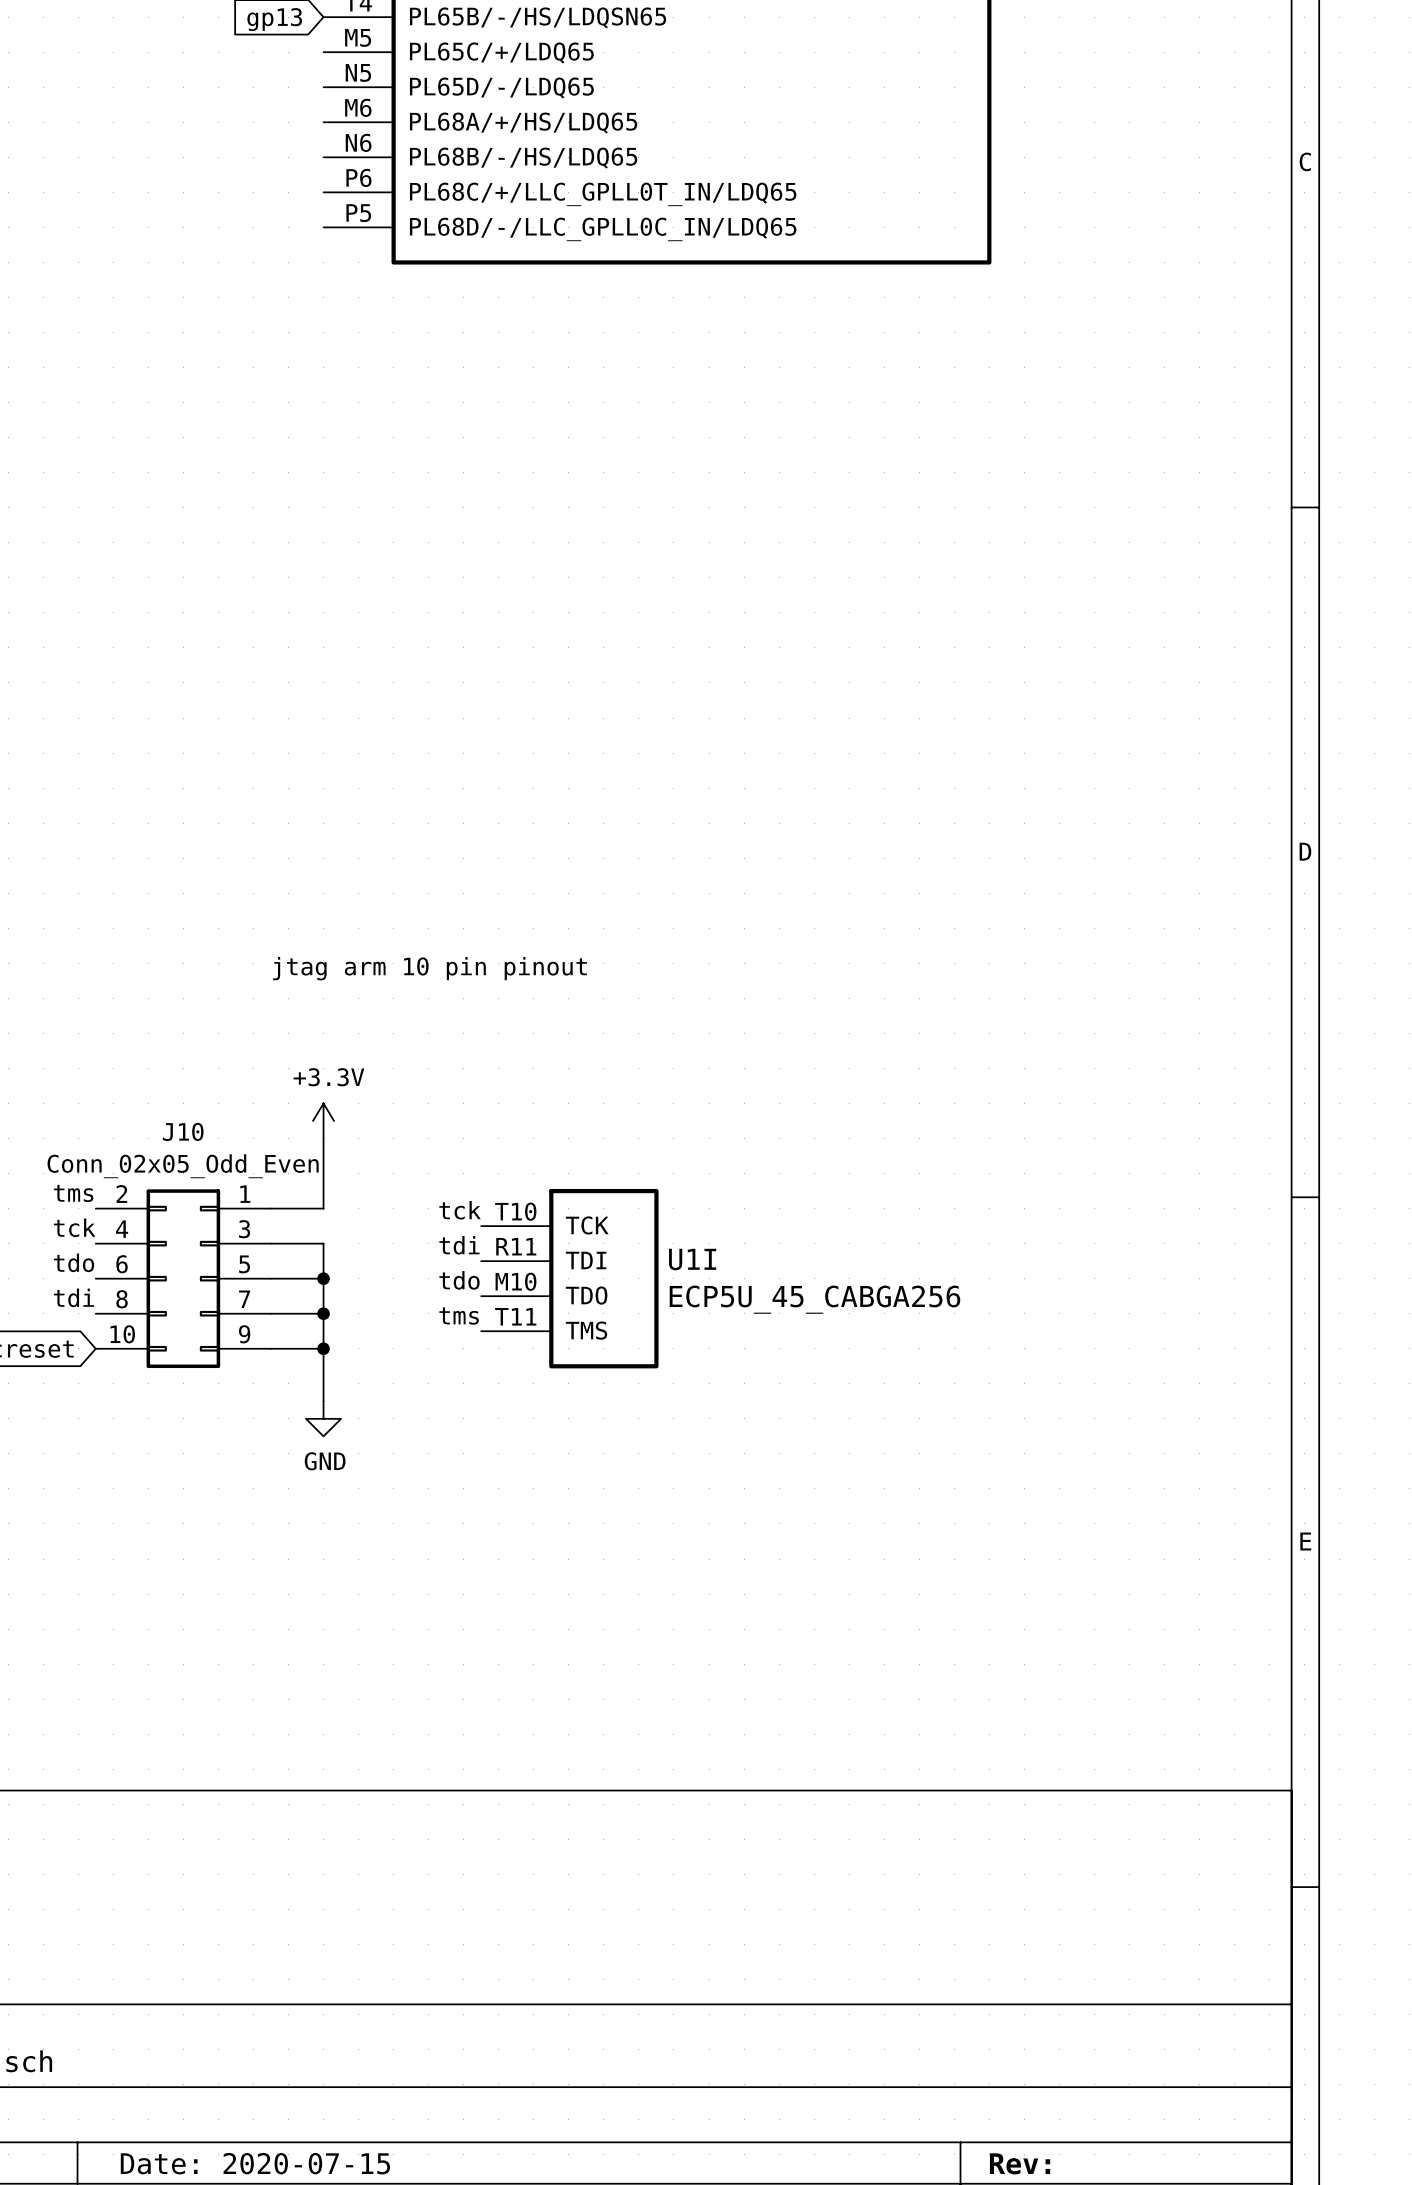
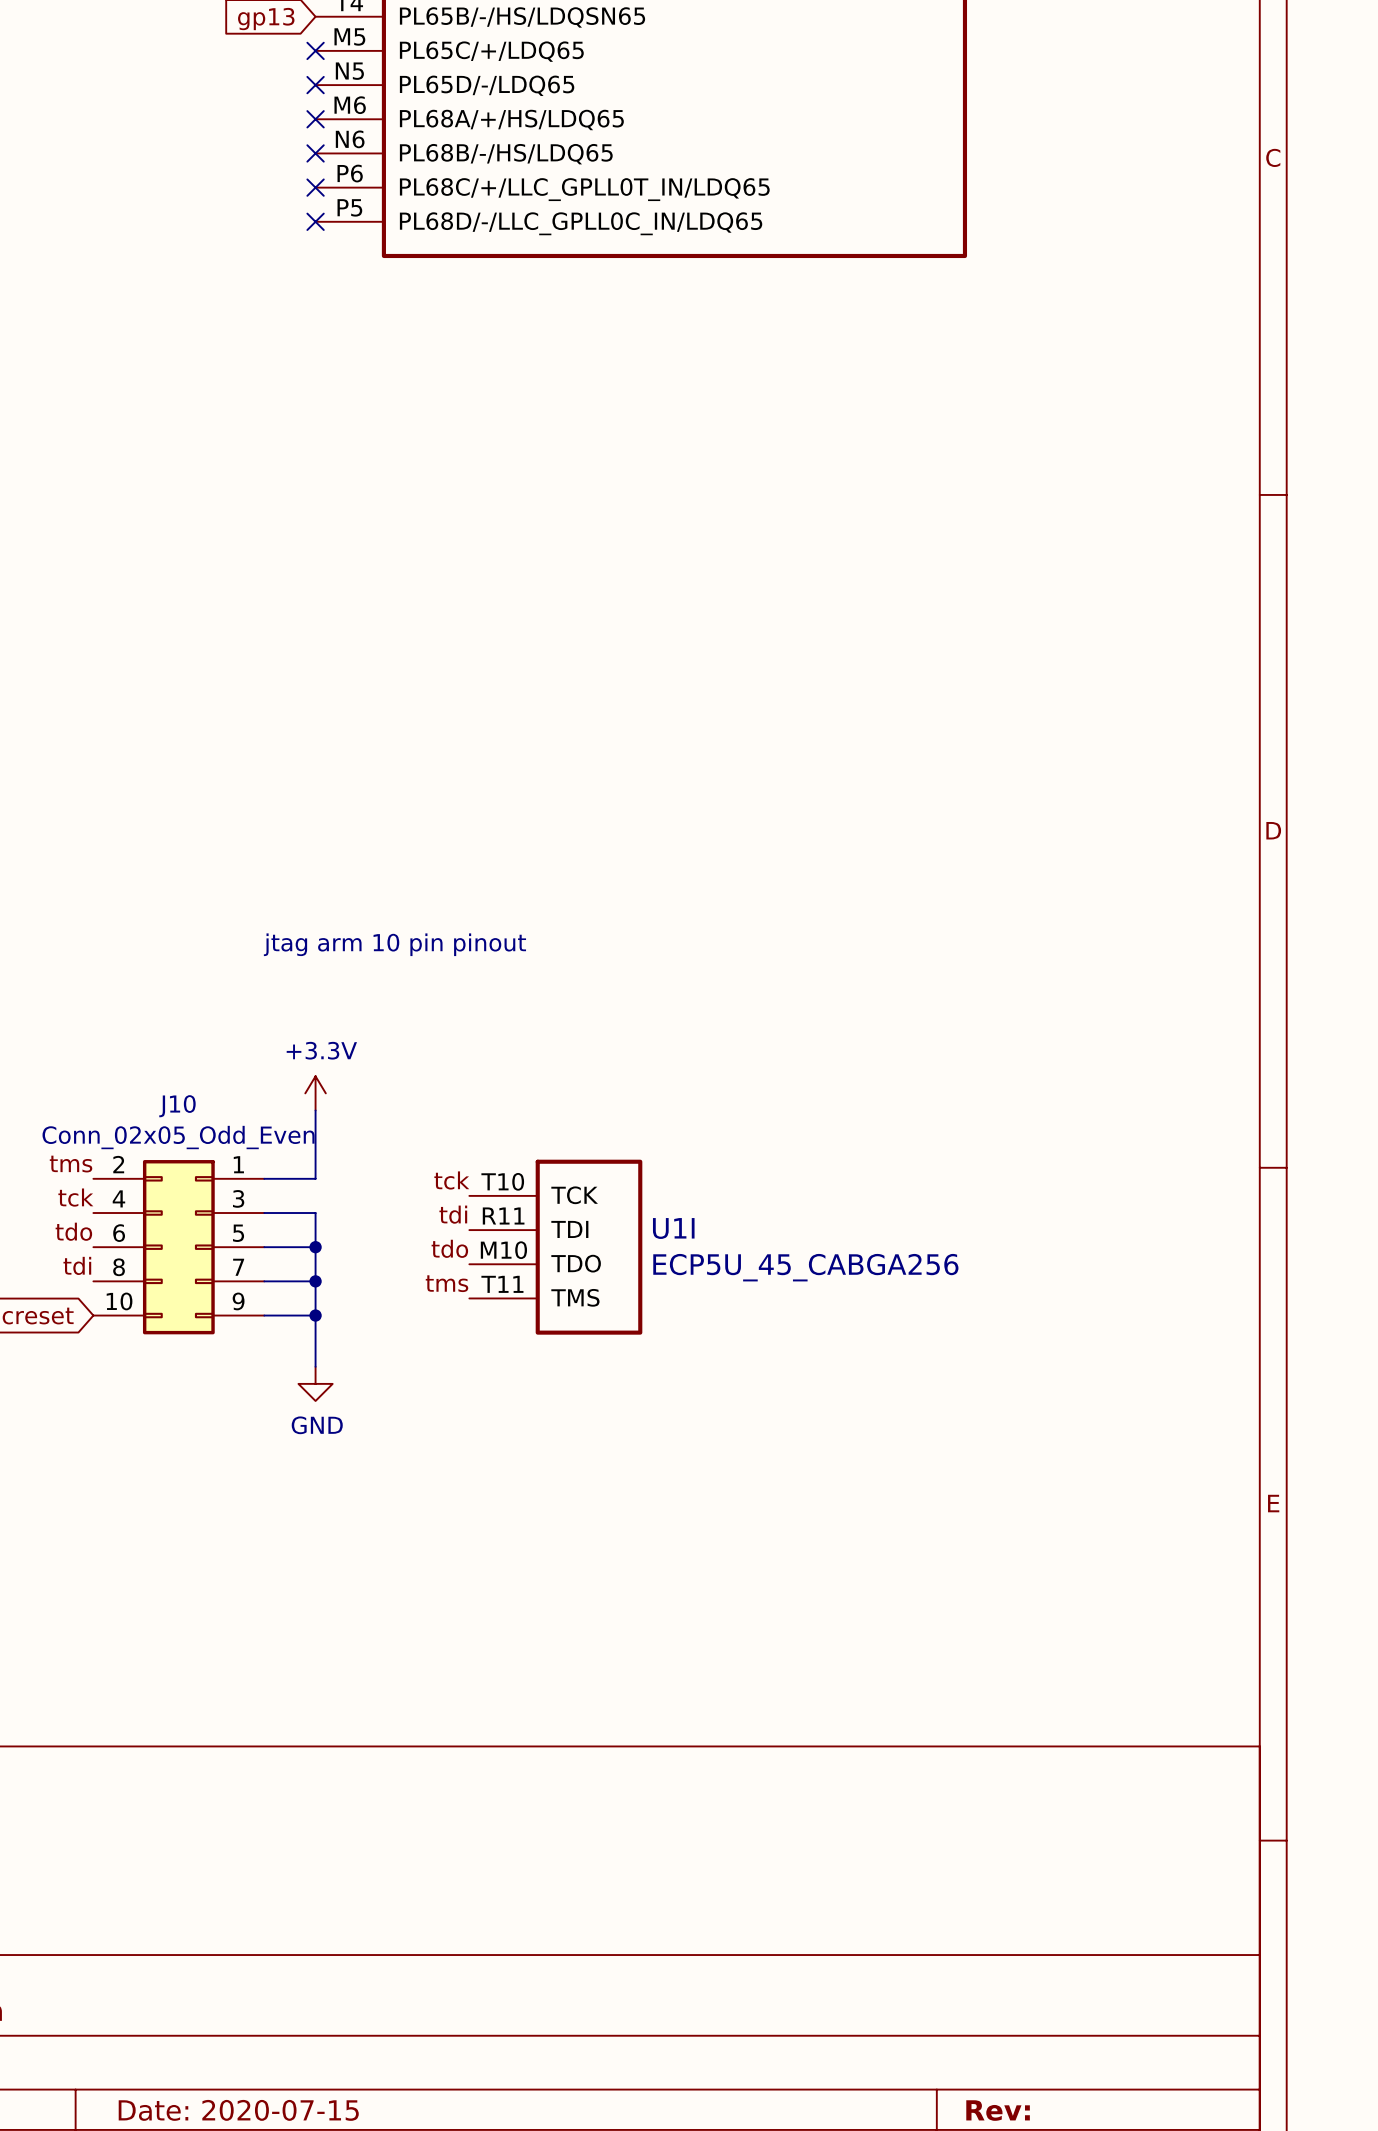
no-connect mark: none -> (315, 50)
no-connect mark: none -> (315, 85)
no-connect mark: none -> (315, 119)
no-connect mark: none -> (315, 153)
no-connect mark: none -> (315, 187)
no-connect mark: none -> (315, 221)

